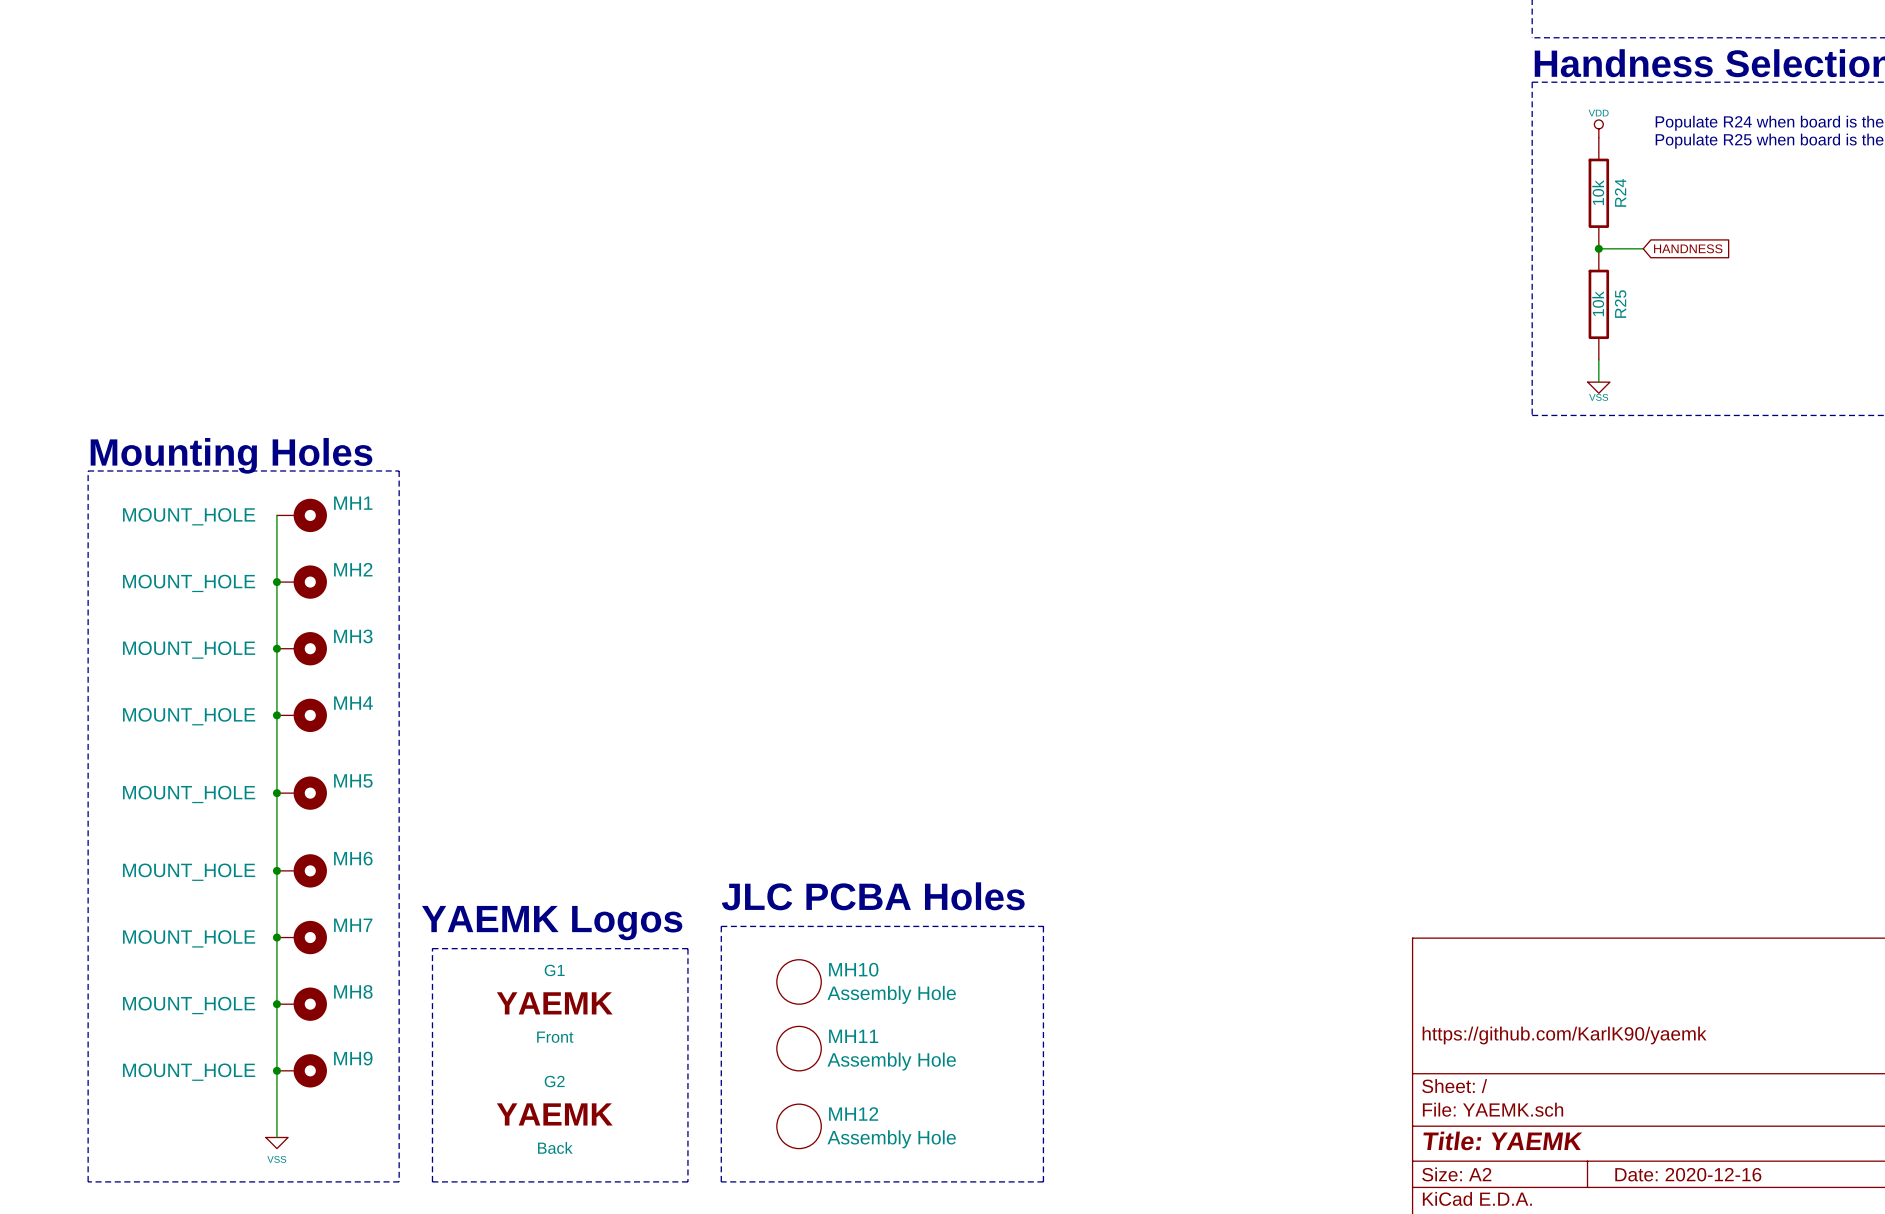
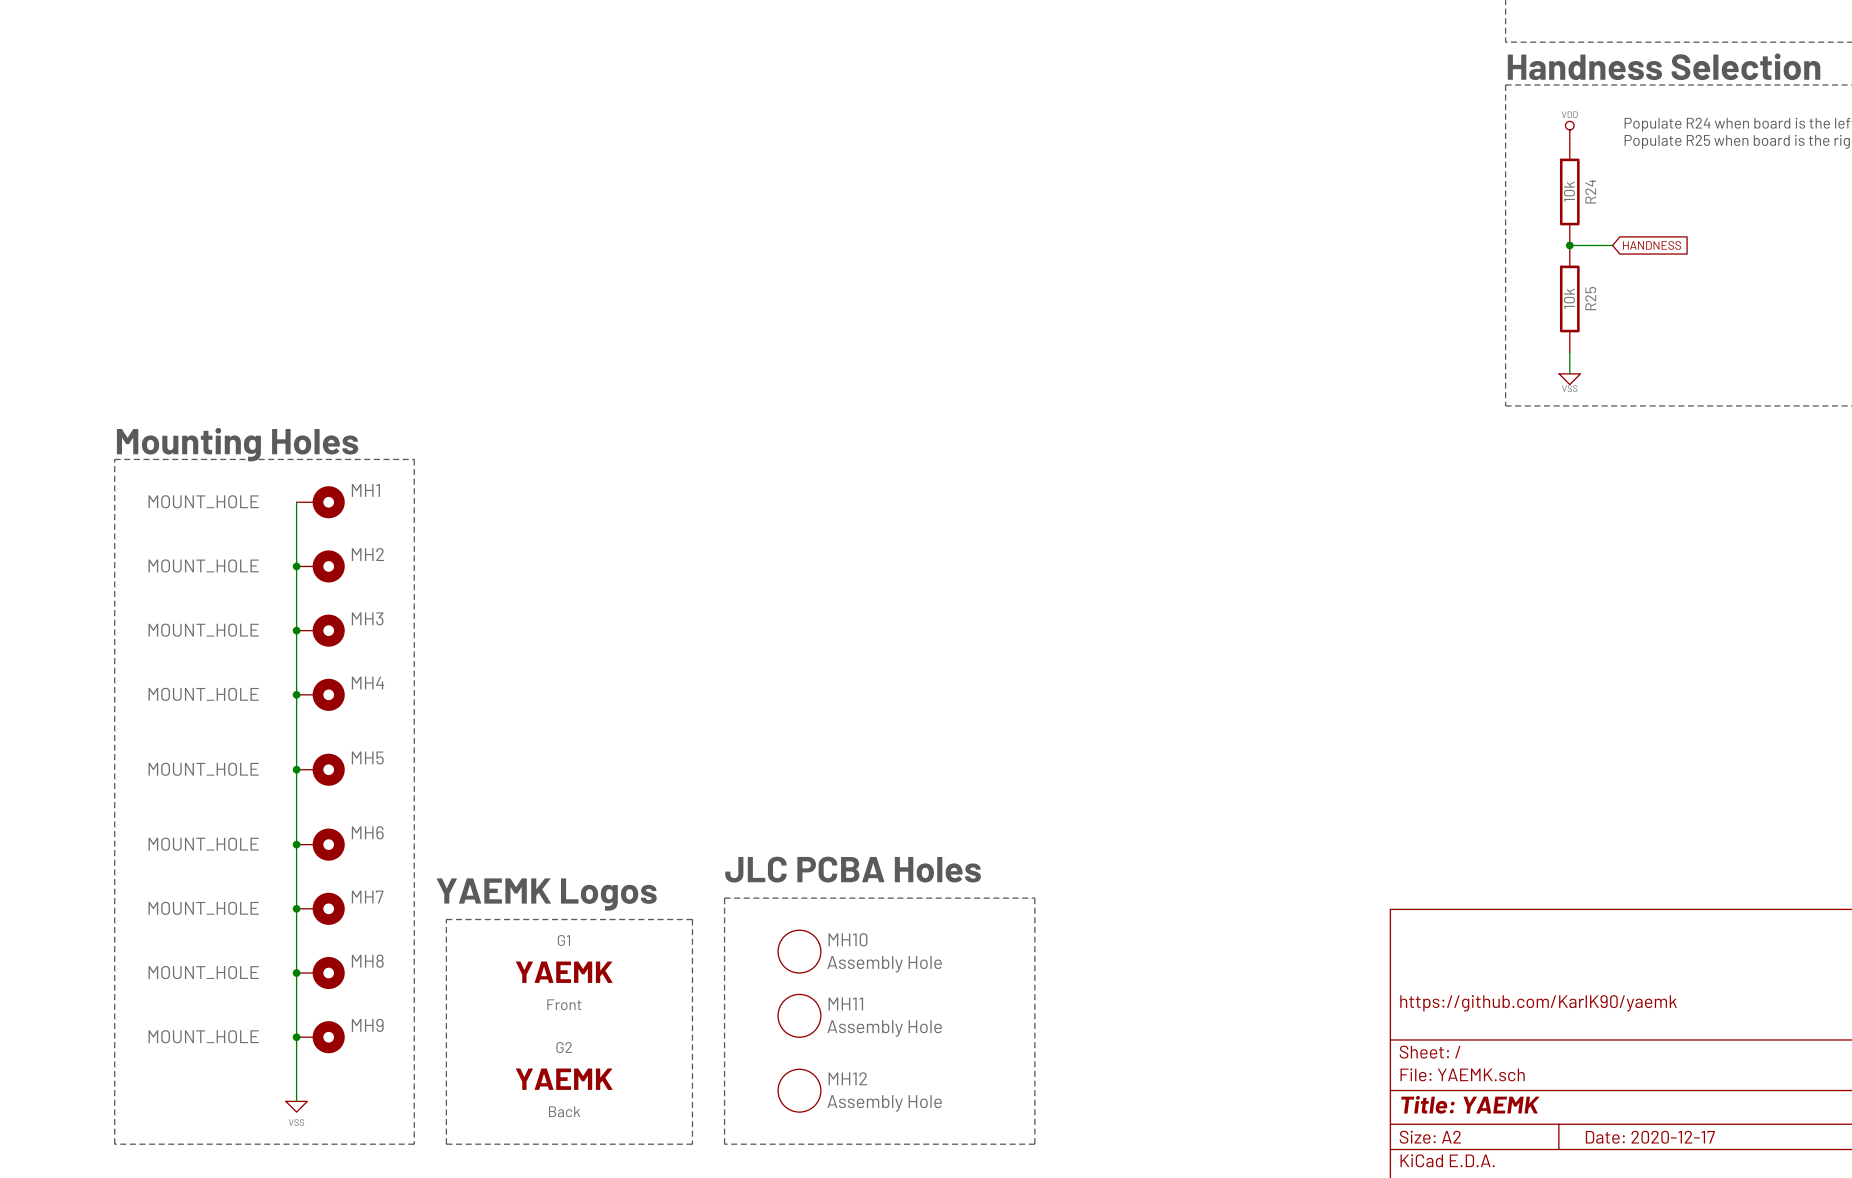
title block: Date: 2020-12-16 (1688, 1174) -> Date: 2020-12-17 (1650, 1137)

